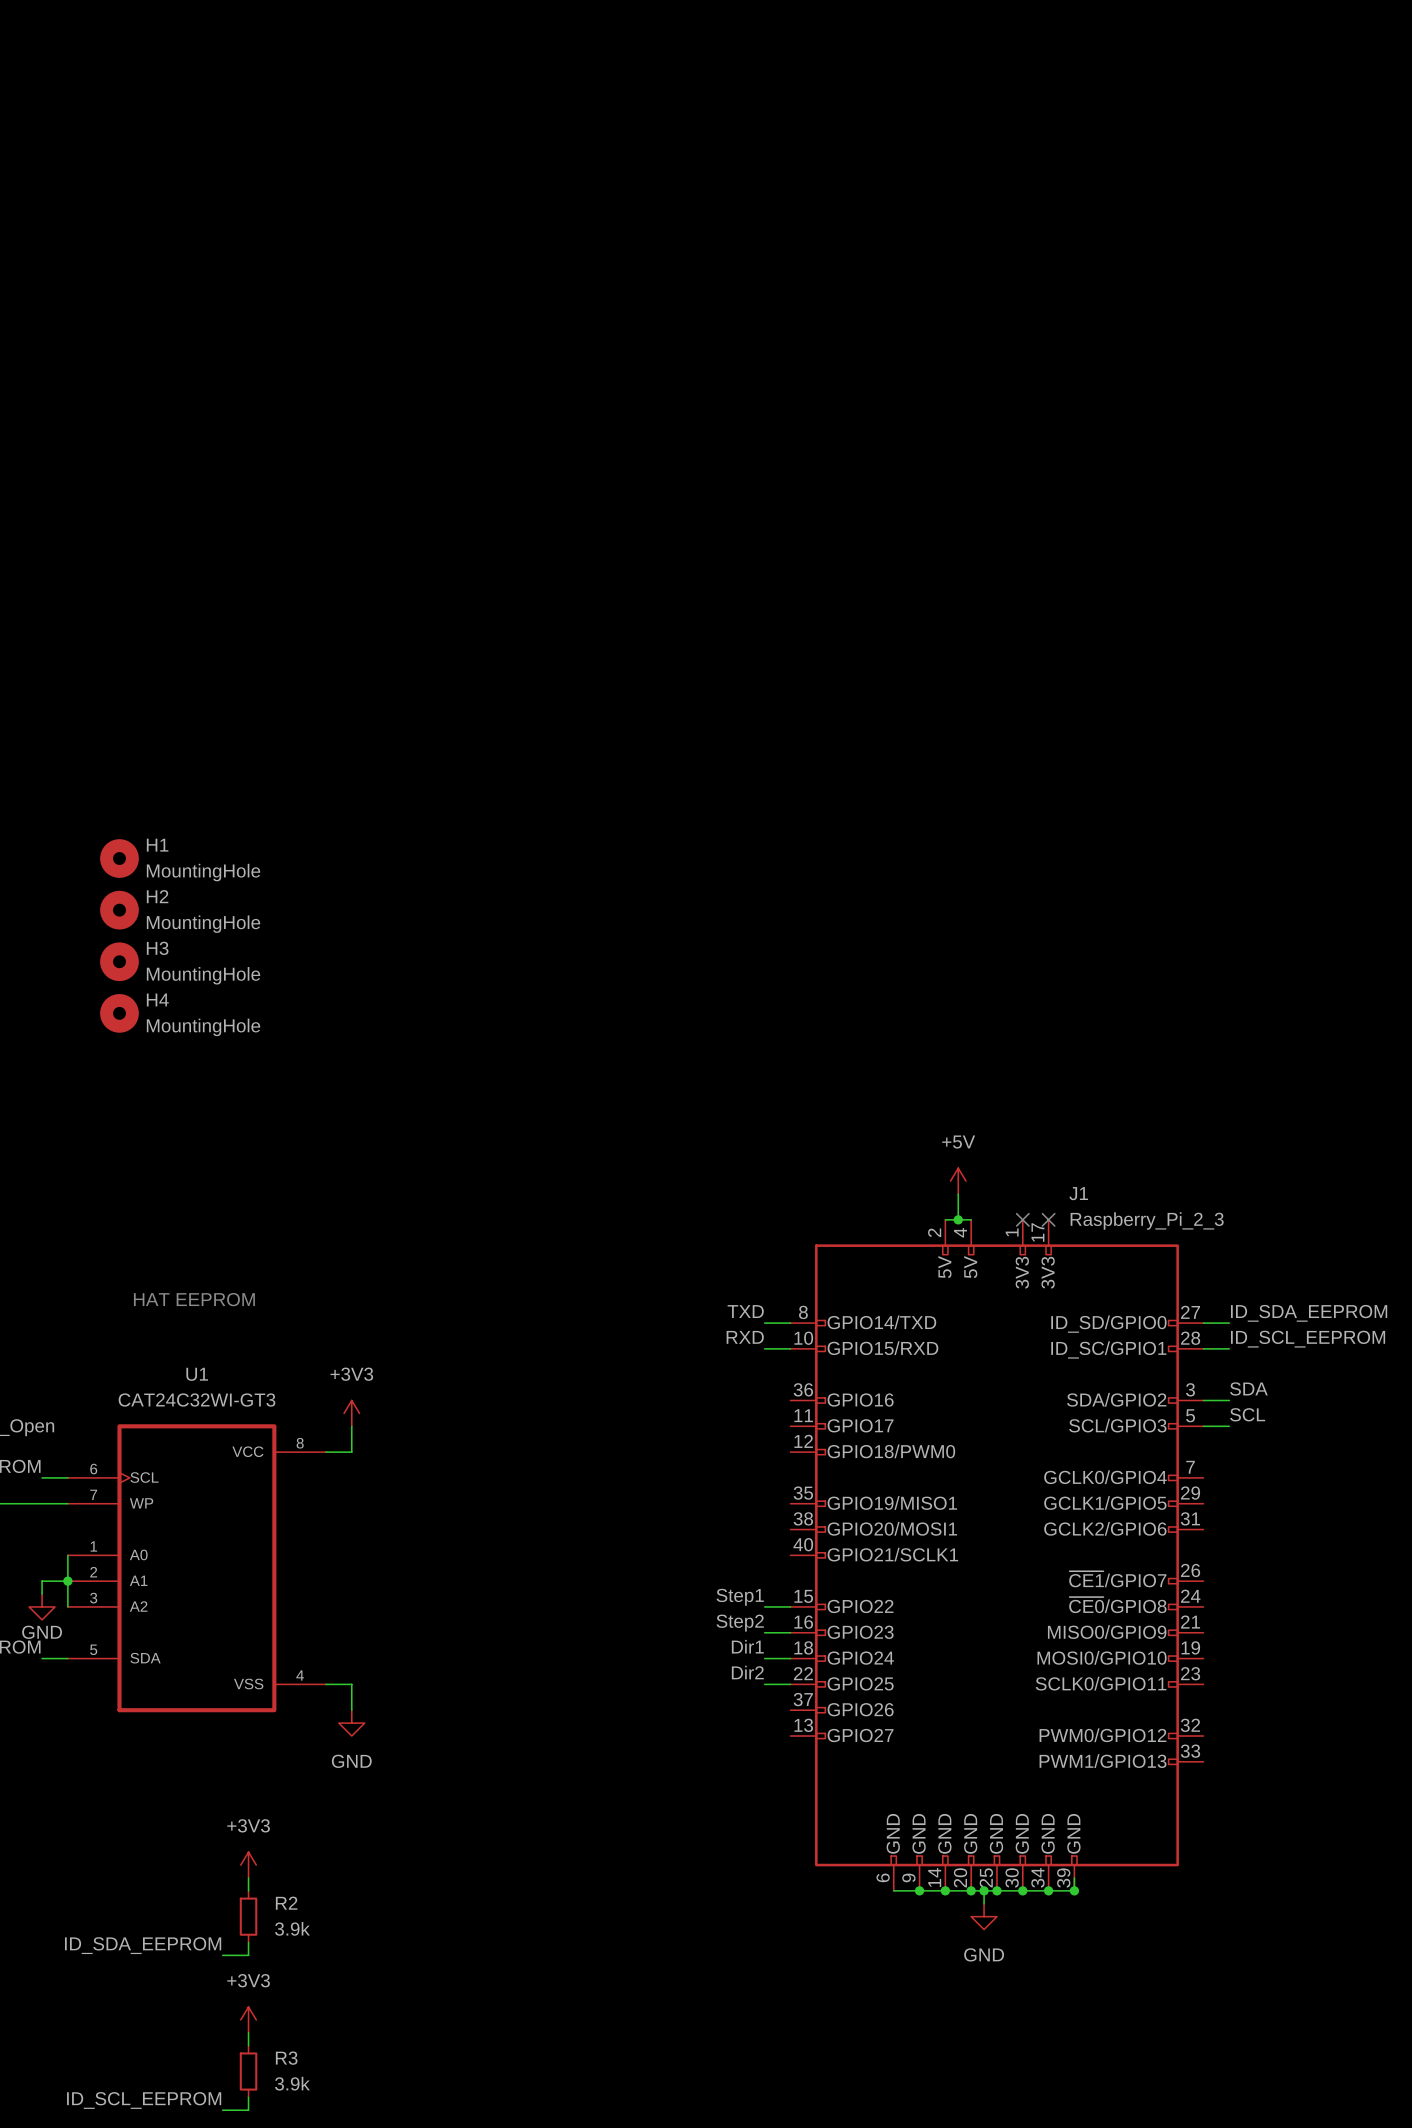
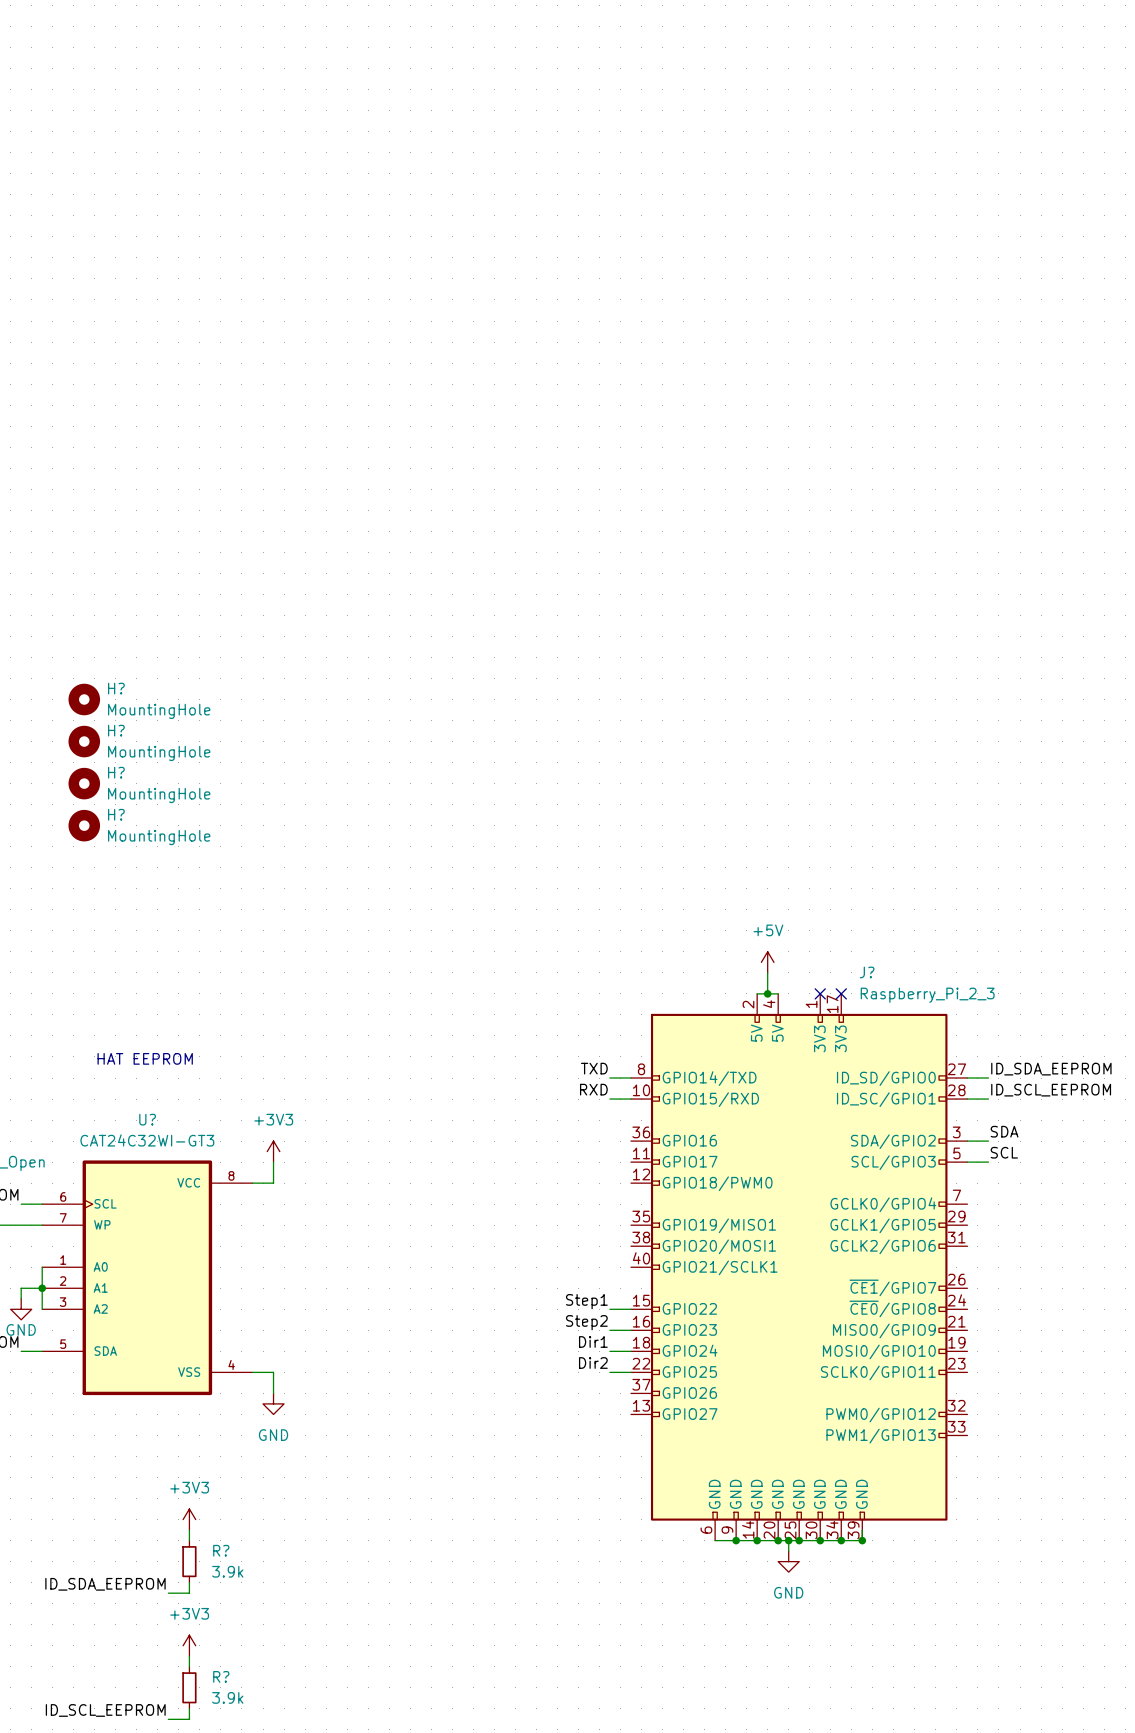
H1 name: H1 (157, 845) -> H? (116, 688)
H2 name: H2 (157, 896) -> H? (116, 730)
H3 name: H3 (157, 948) -> H? (116, 772)
H4 name: H4 (157, 999) -> H? (116, 814)
J1 name: J1 (1078, 1193) -> J? (867, 972)
U1 name: U1 (197, 1374) -> U? (147, 1119)
R2 name: R2 (286, 1903) -> R? (221, 1550)
R3 name: R3 (286, 2058) -> R? (221, 1676)

